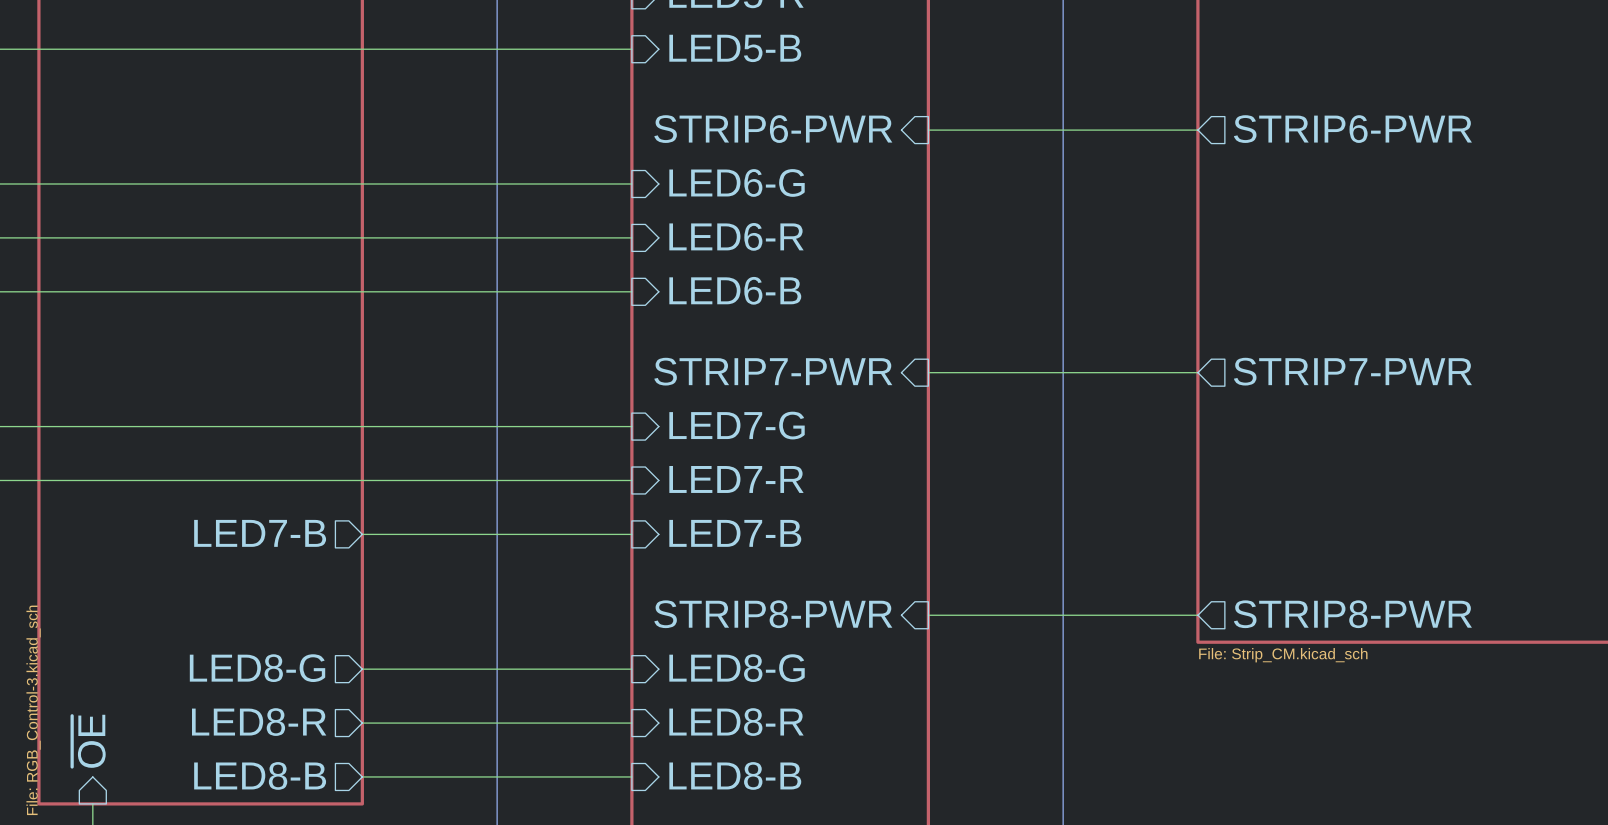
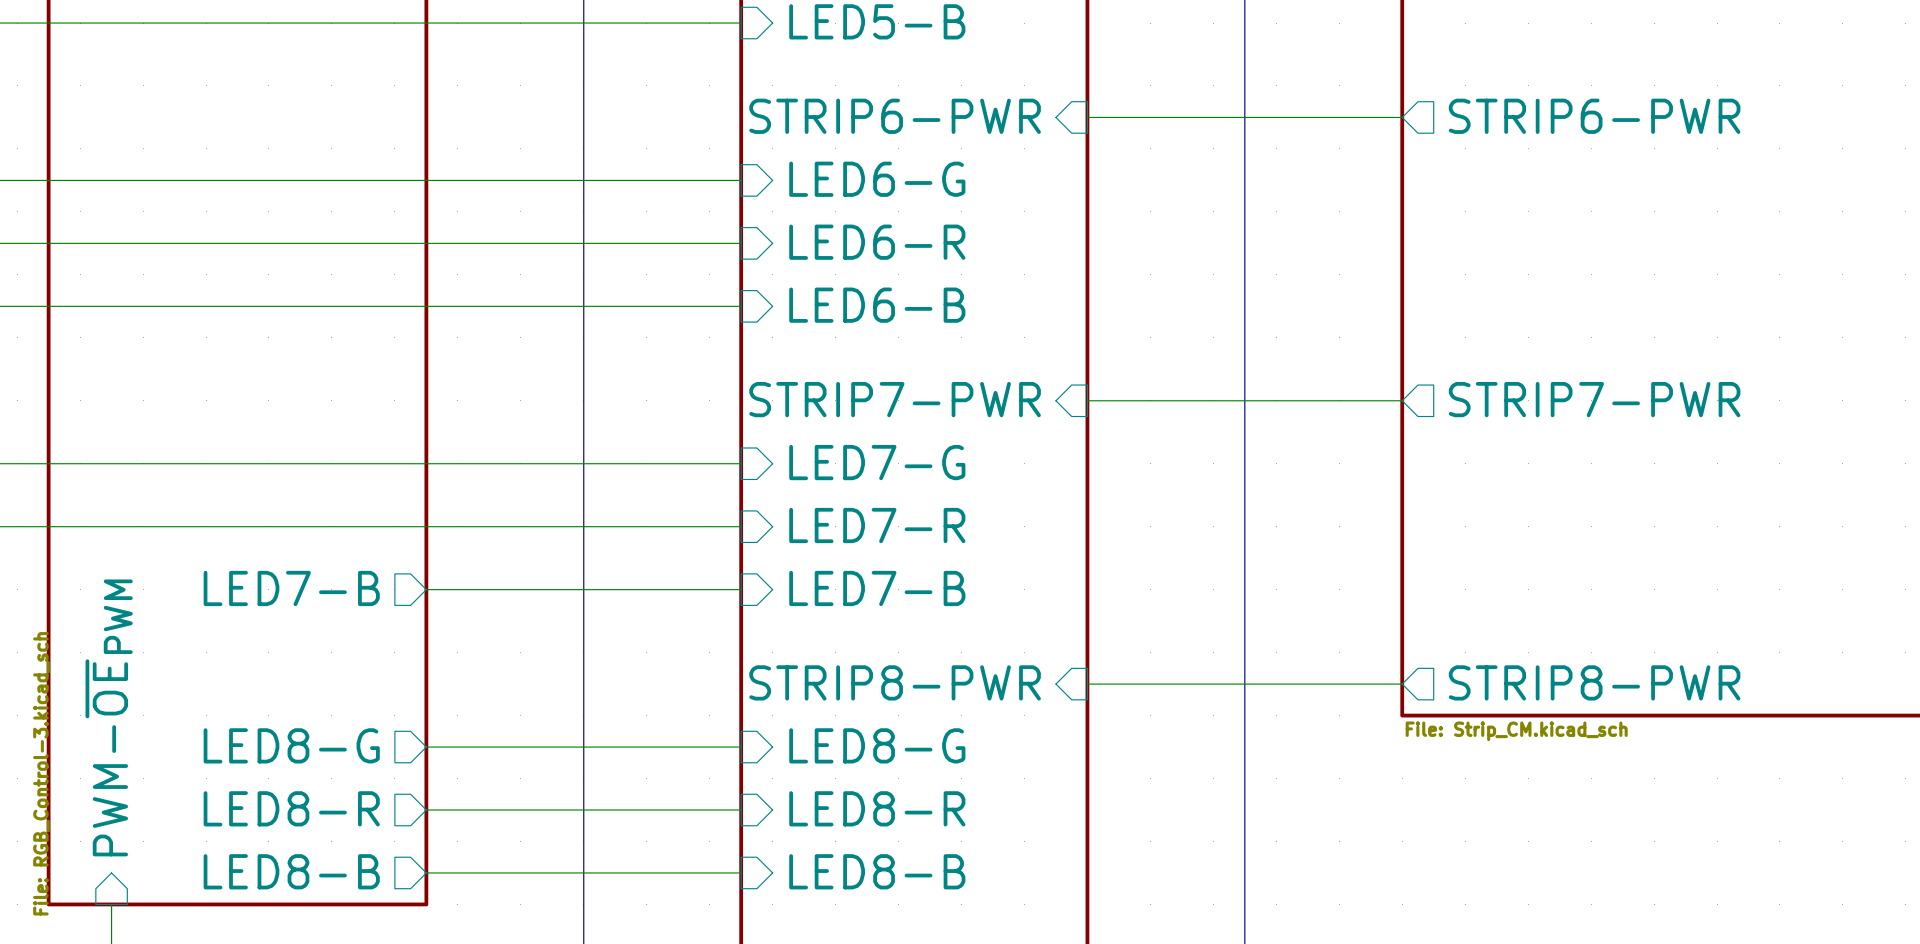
sheet pin: ~{OE} (88, 741) -> PWM-~{OE}PWM (109, 717)

